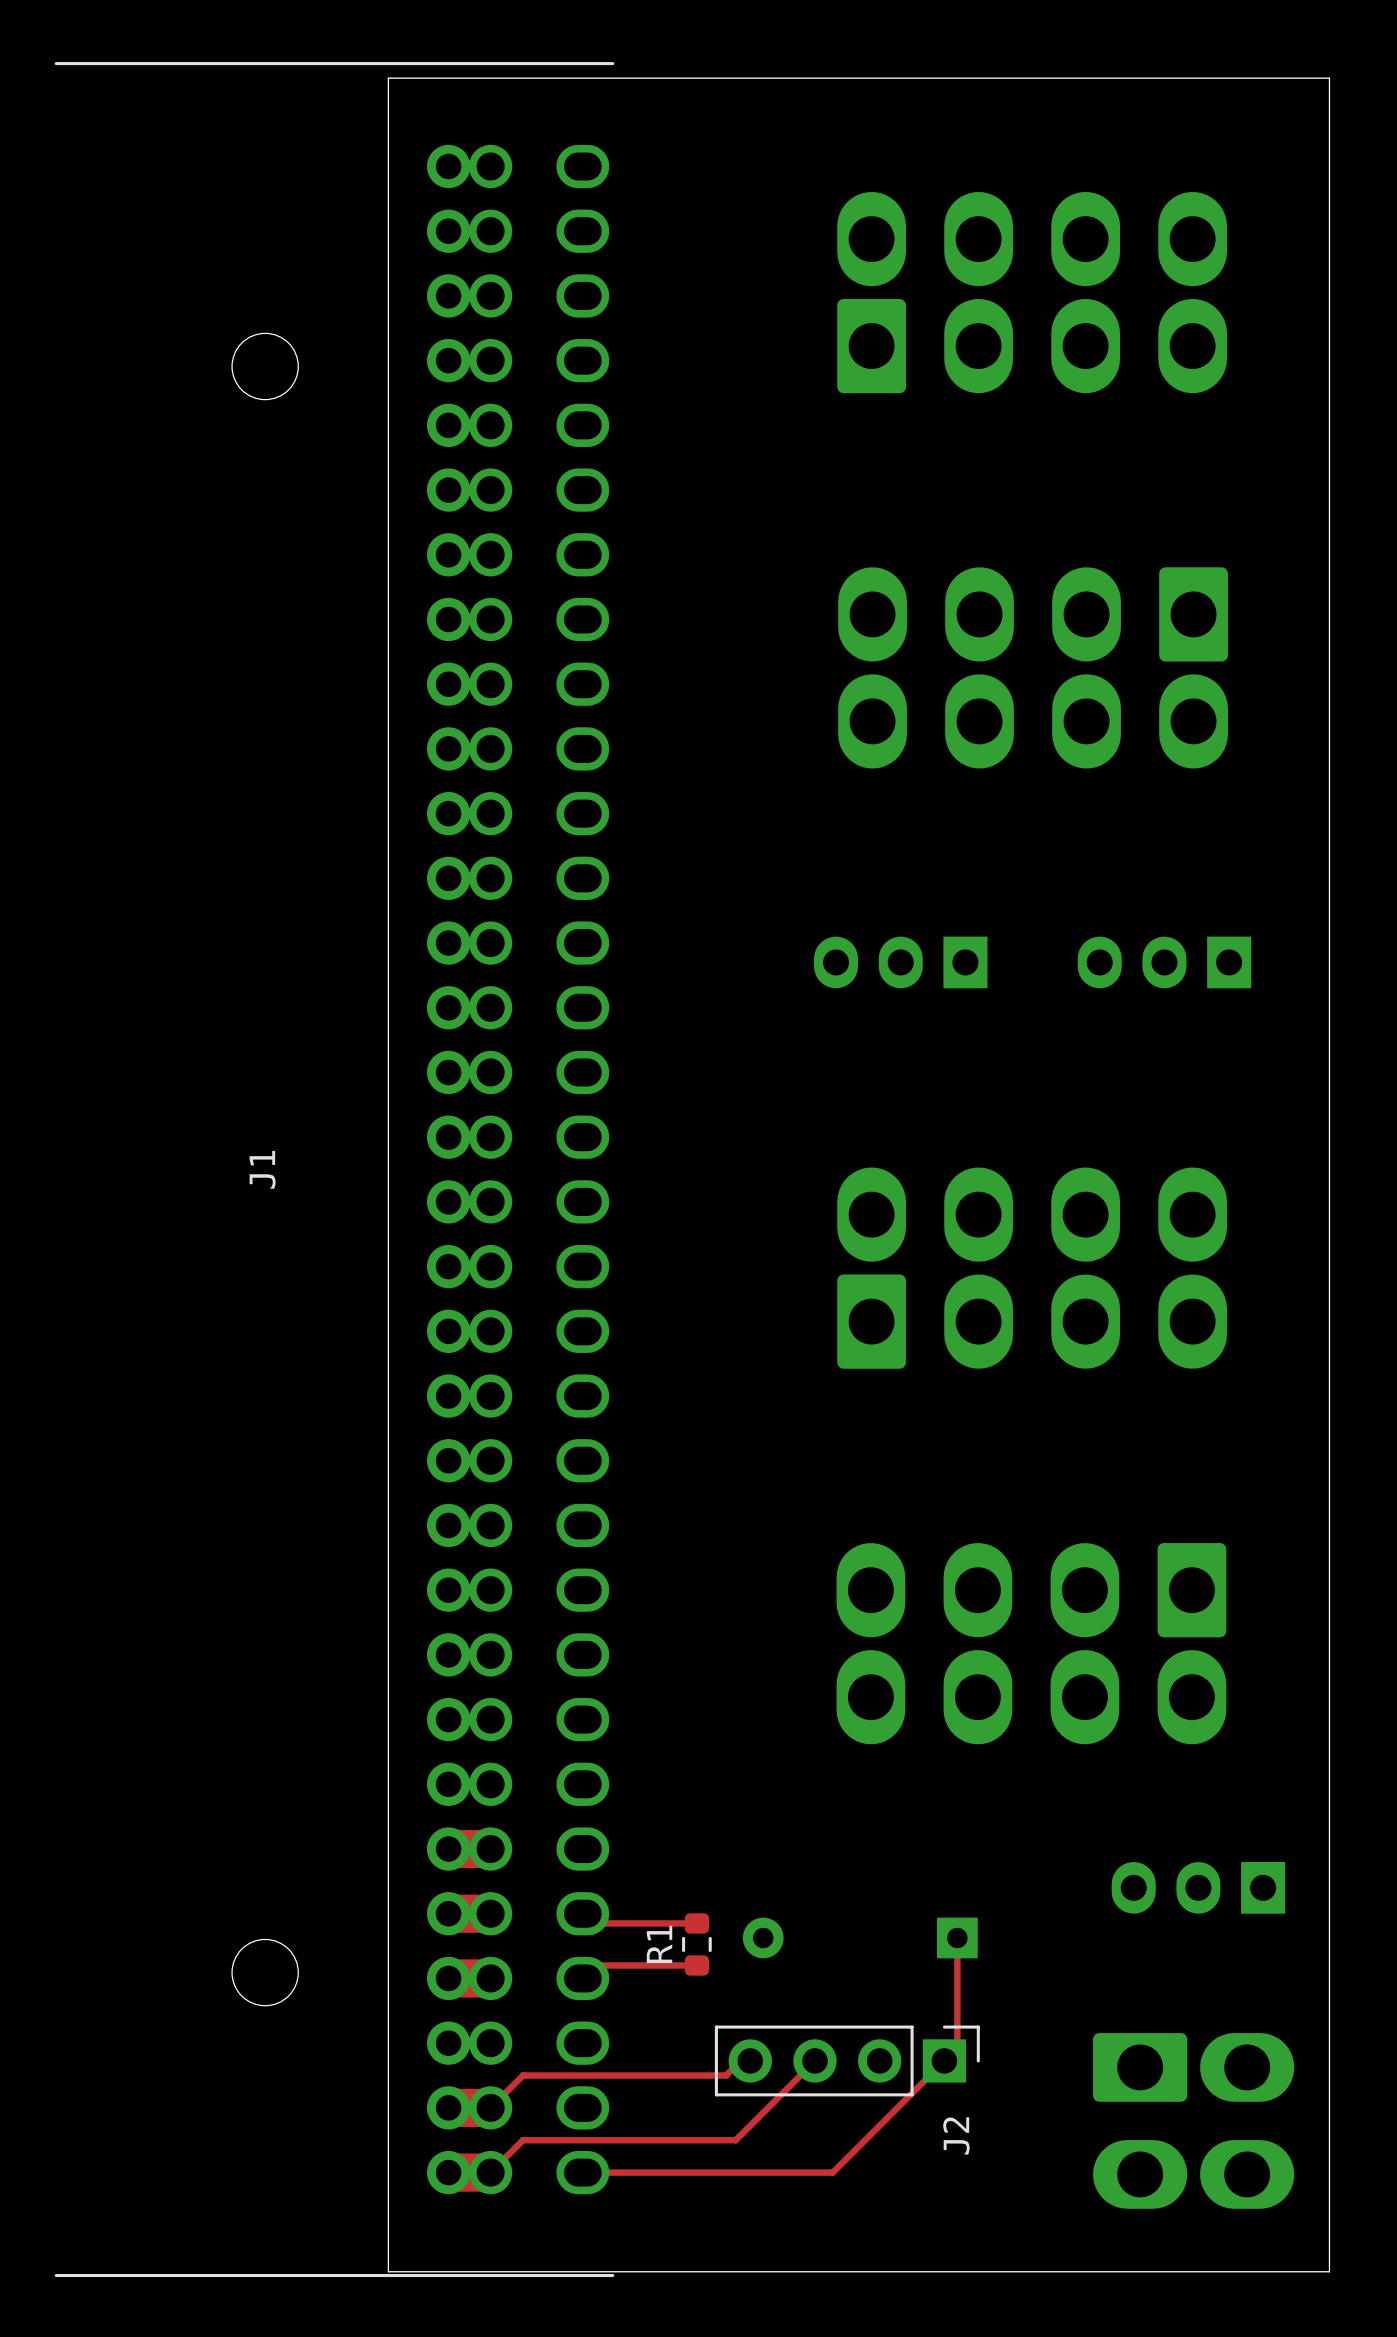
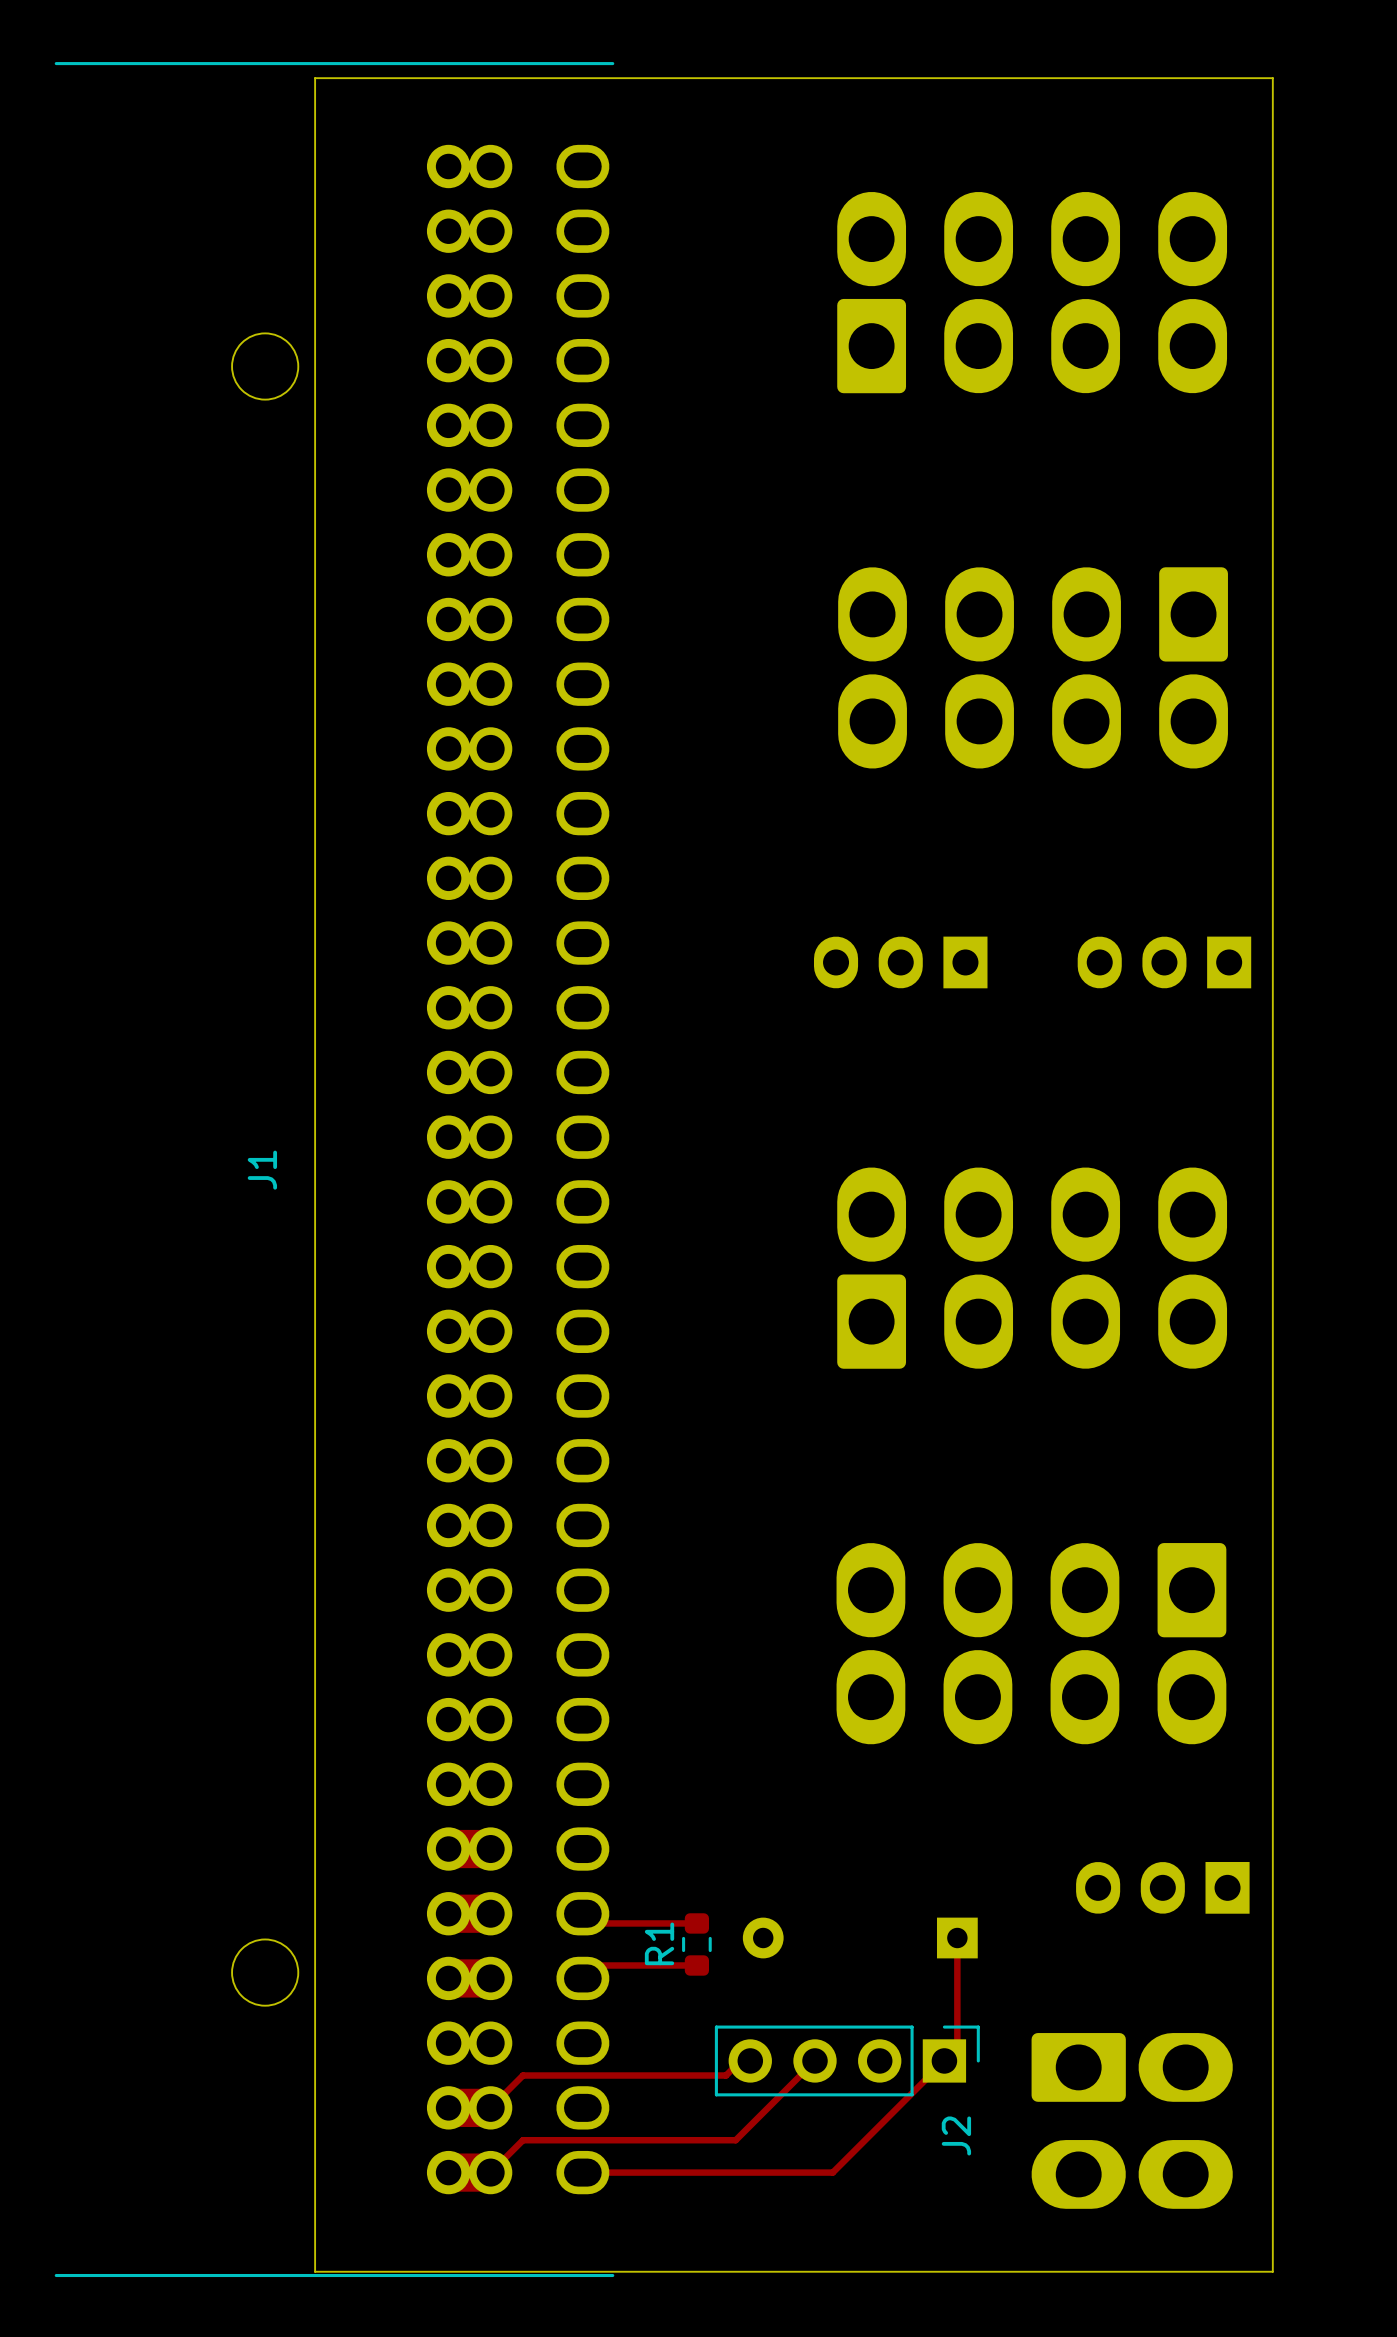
board edge: (388, 78) (388, 2271) -> (388, 78) (315, 78) (315, 2271) (388, 2271)
board edge: (1272, 78) (1329, 78) (1329, 2271) (1272, 2271) -> (1272, 78) (1272, 2271)
part position: (1198, 1887) -> (1162, 1887)
part position: (1193, 2120) -> (1132, 2120)

